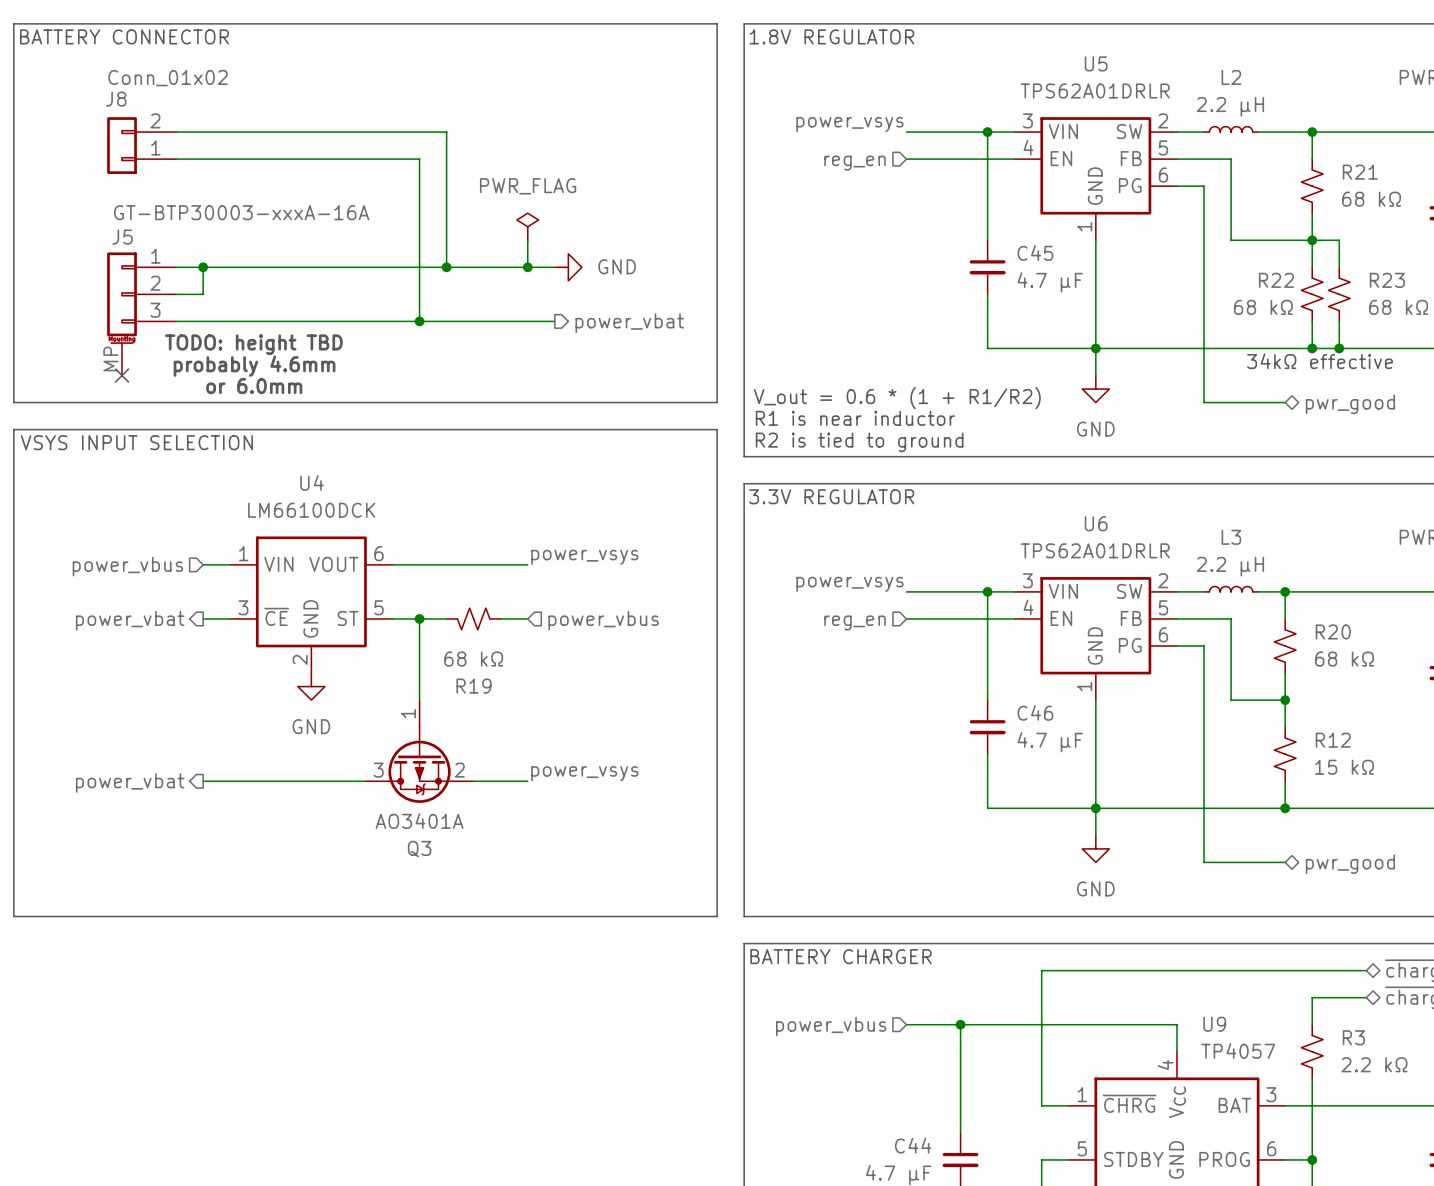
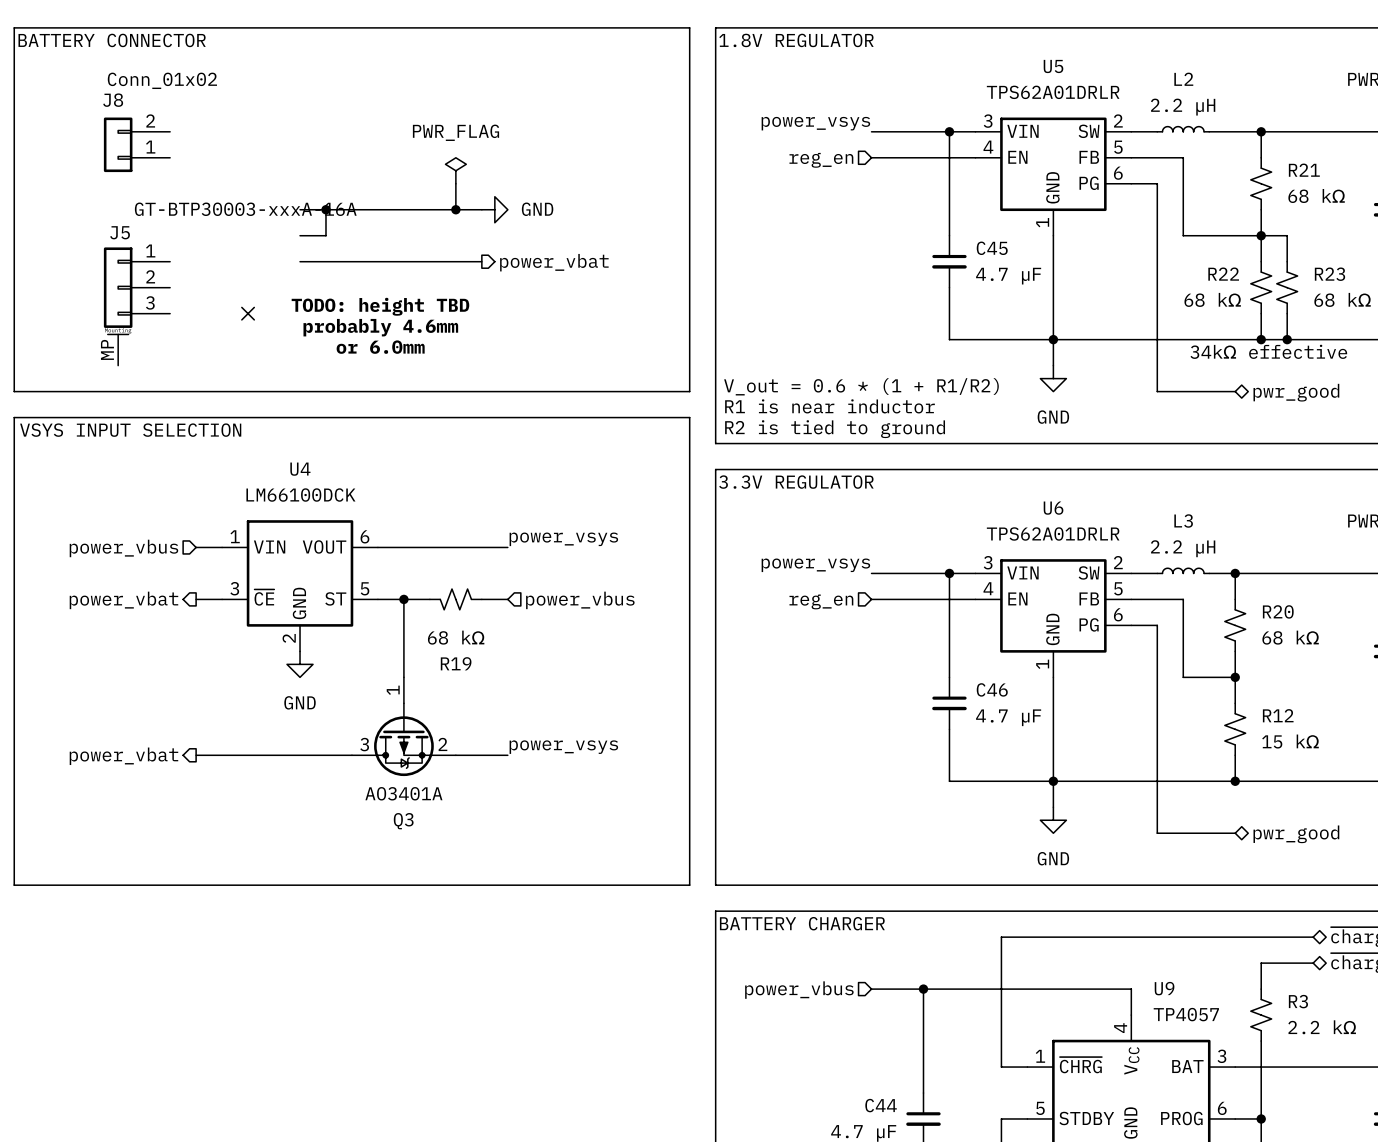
wire: (176, 132) (446, 132) (446, 267) -> none
wire: (176, 159) (419, 159) (419, 321) -> none
wire: none -> (300, 209) (481, 209)
junction: none -> (325, 209)
junction: none -> (455, 209)
power symbol position: PWR_FLAG (527, 226) -> PWR_FLAG (455, 170)
wire: (527, 240) (527, 267) -> (455, 183) (455, 209)
wire: (176, 267) (311, 267) -> none
wire: (203, 267) (203, 294) (176, 294) -> (325, 209) (325, 235) (300, 235)
junction: (203, 267) -> none
junction: (446, 267) -> none
wire: (500, 267) (554, 267) -> none
junction: (527, 267) -> none
power symbol position: GND (568, 267) -> GND (494, 209)
wire: (176, 321) (554, 321) -> none
no-connect mark: none -> (248, 313)
junction: (419, 321) -> none
hierarchical label position: power_vbat (629, 323) -> power_vbat (554, 262)
text position: TODO: height TBD (253, 344) -> TODO: height TBD (380, 306)
text position: probably 4.6mm (254, 366) -> probably 4.6mm (380, 327)
no-connect mark: (122, 375) -> none
text position: or 6.0mm (254, 386) -> or 6.0mm (380, 347)

